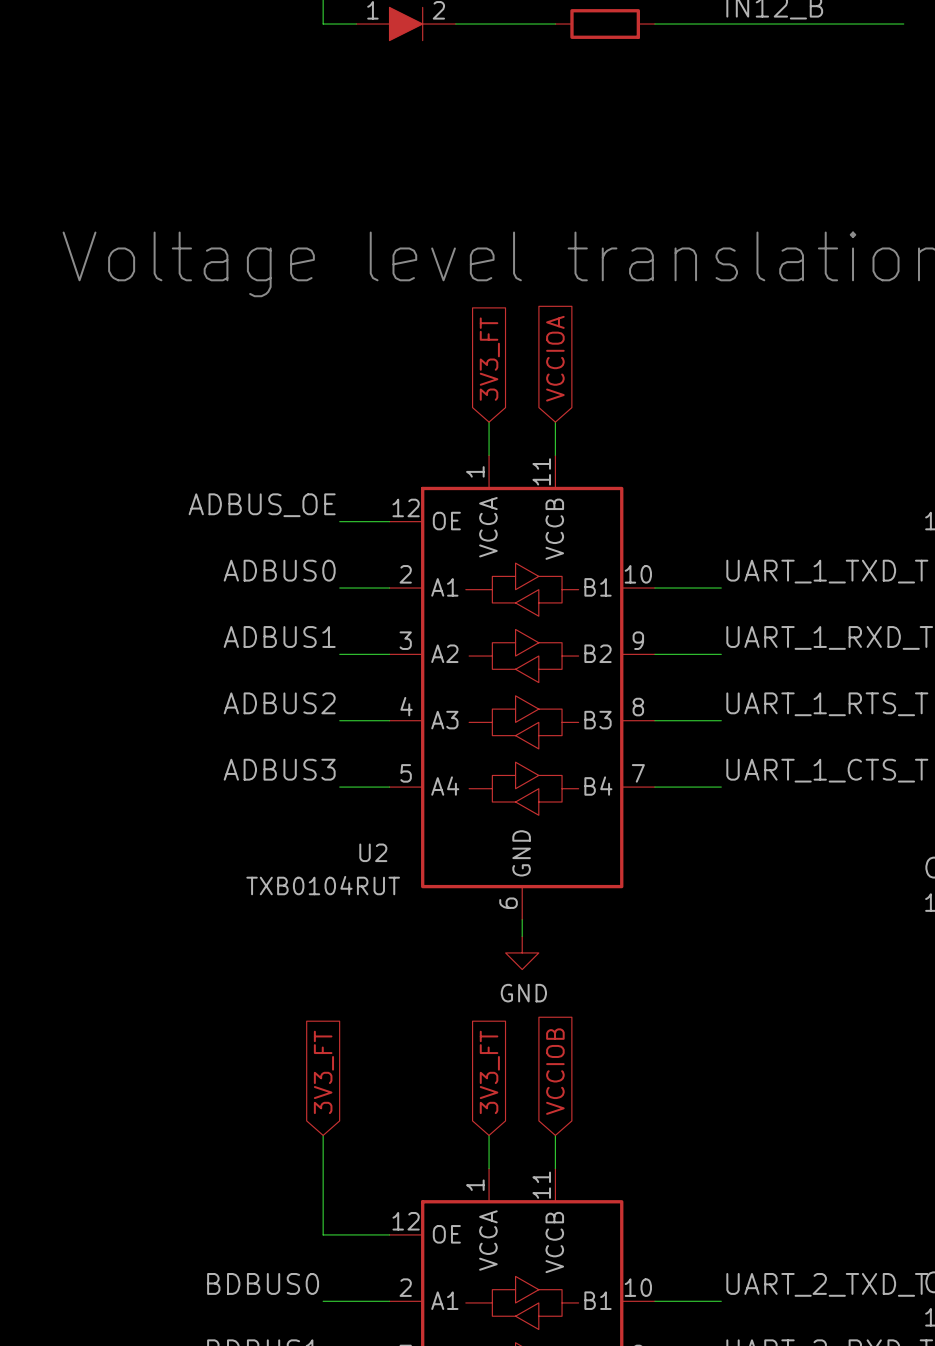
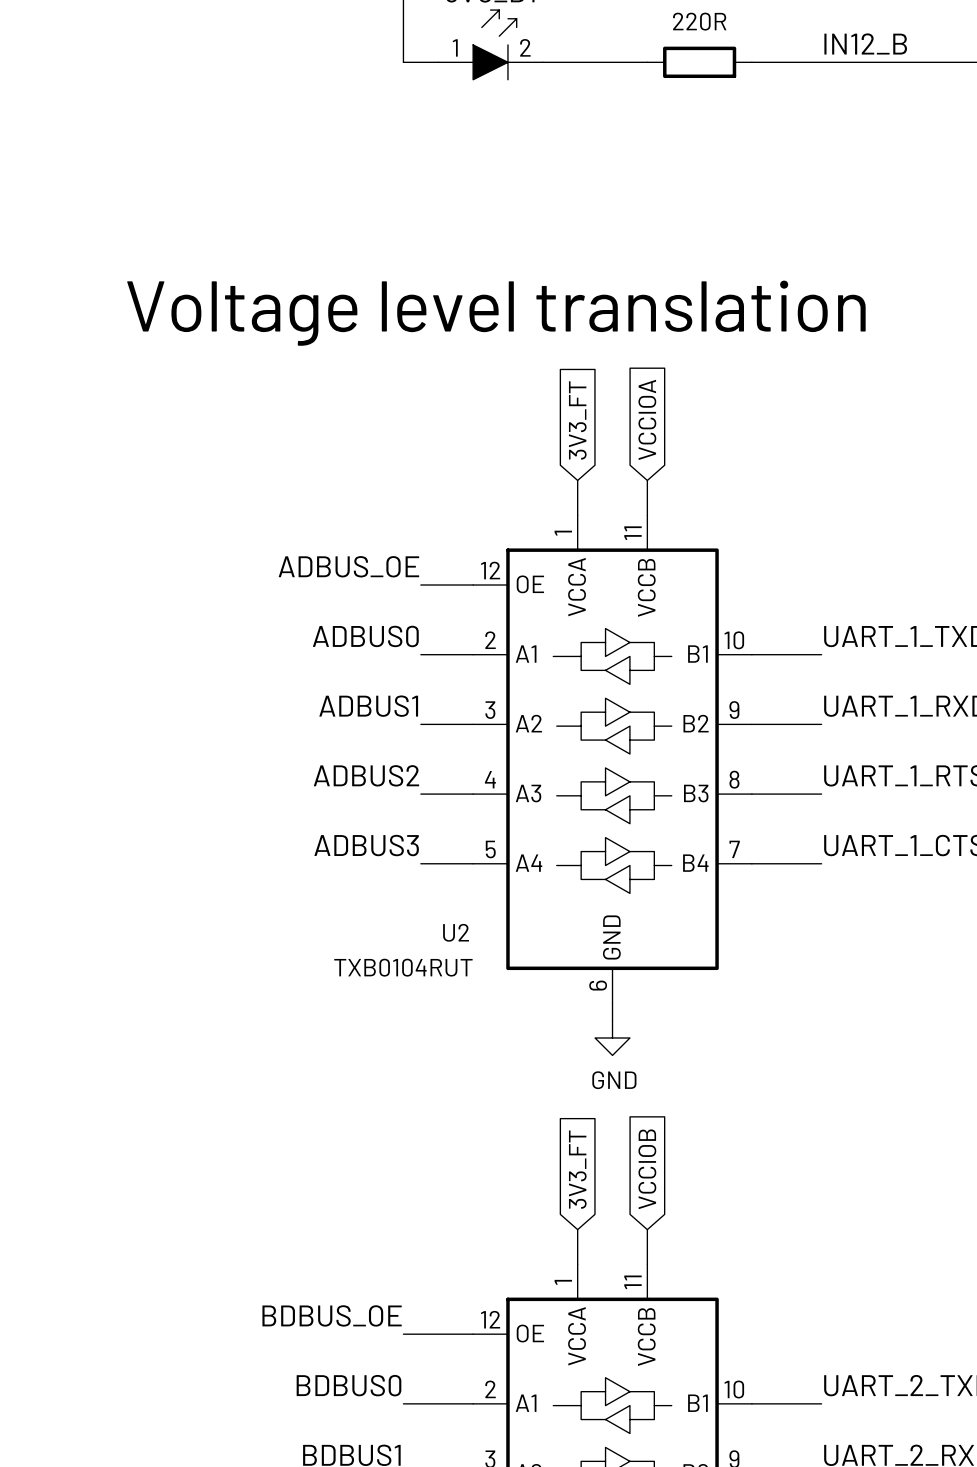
global label: 3V3_FT (323, 1072) -> none
wire: (323, 1135) (323, 1234) -> none
label: none -> BDBUS_OE (332, 1315)

